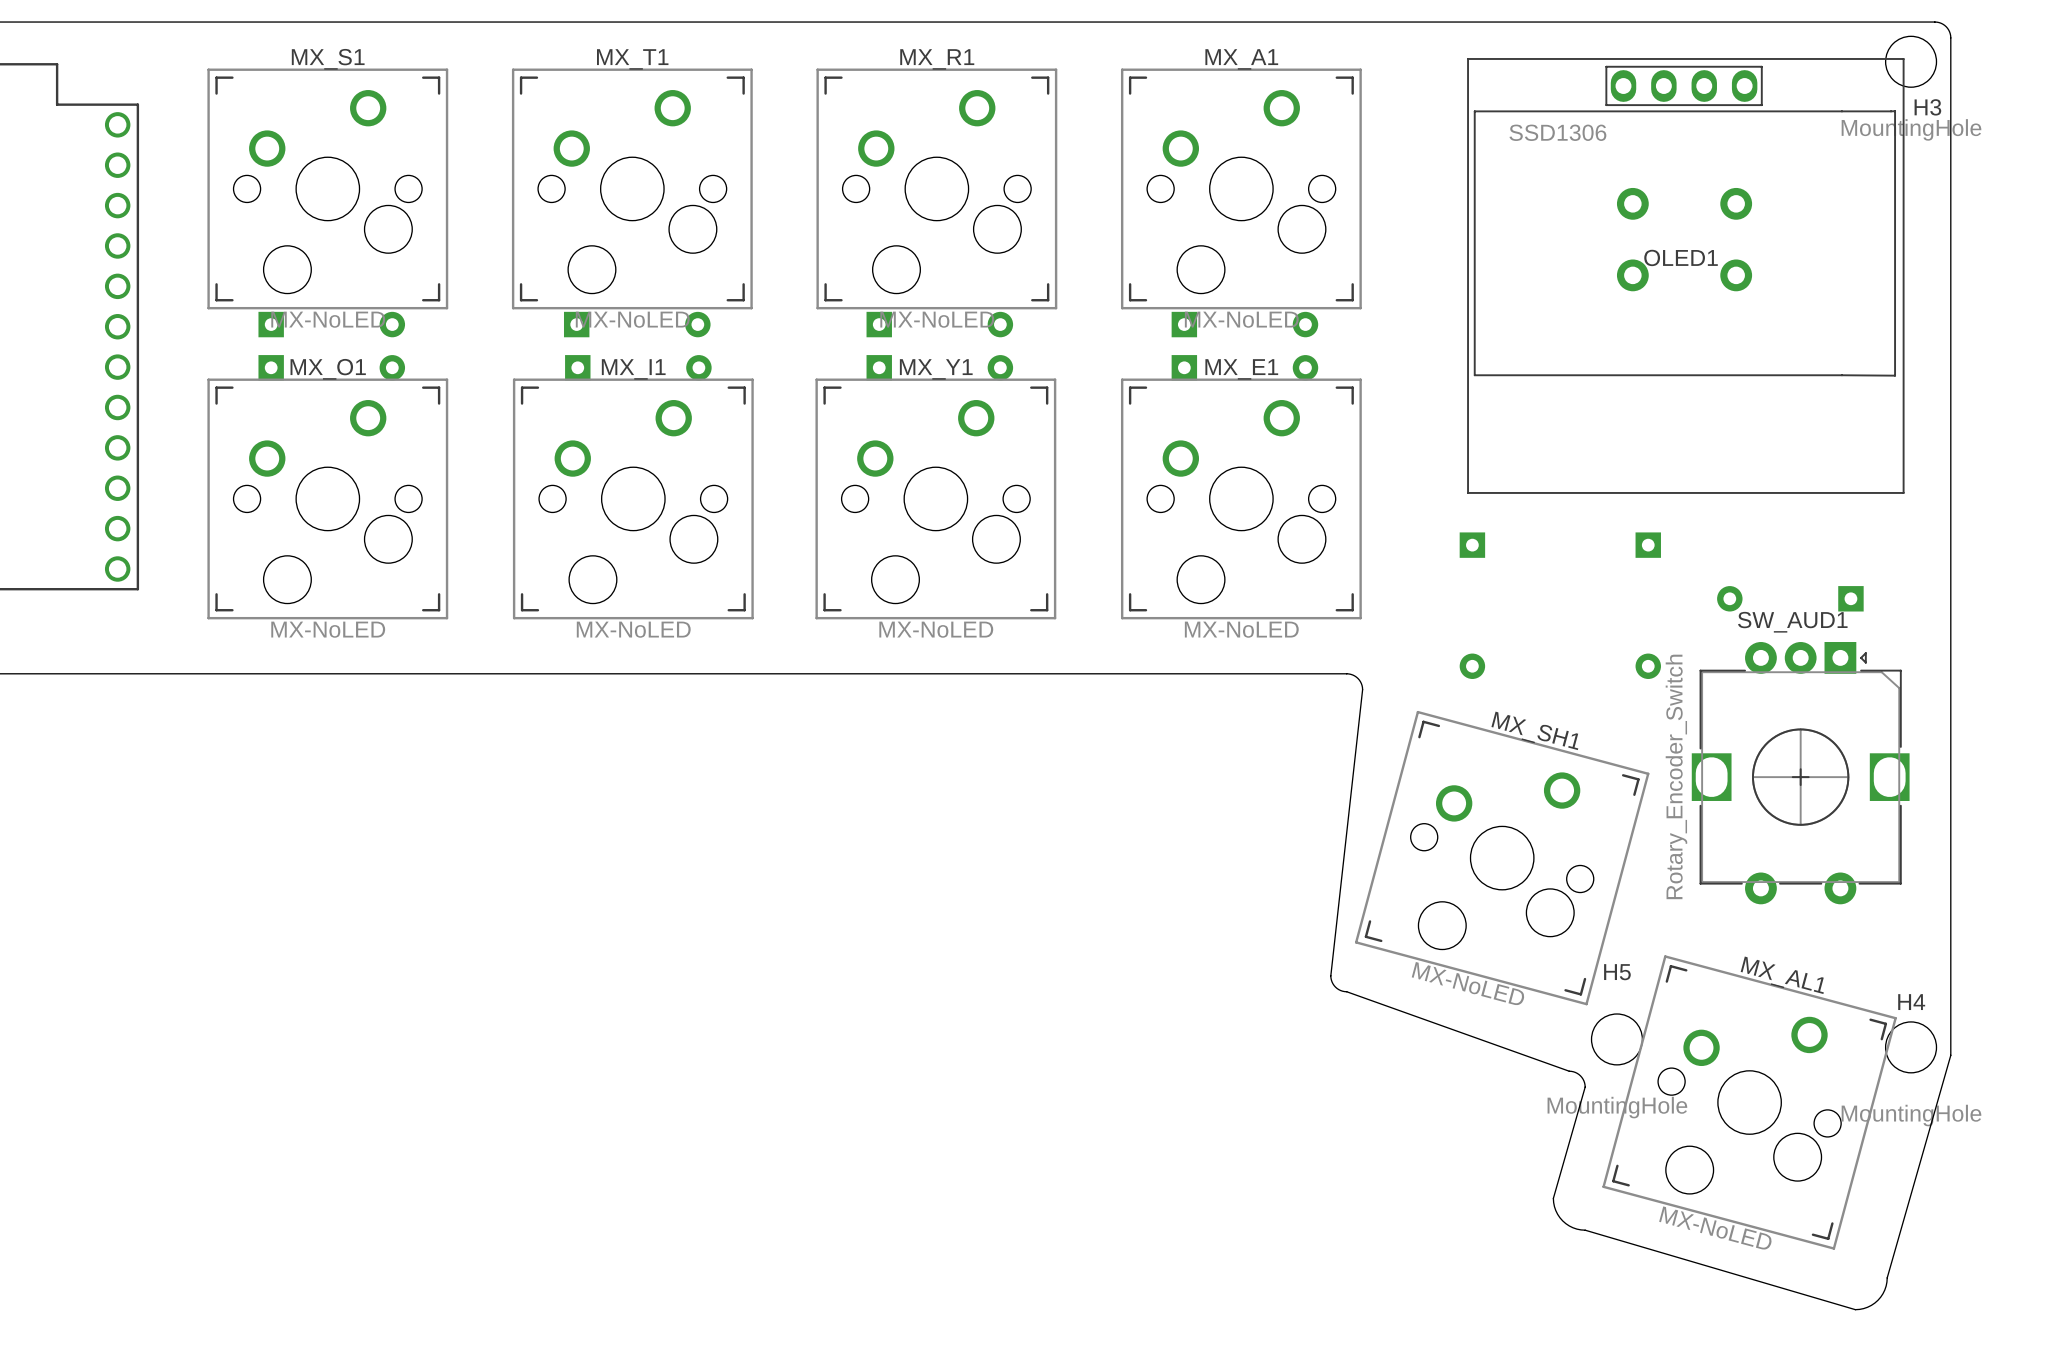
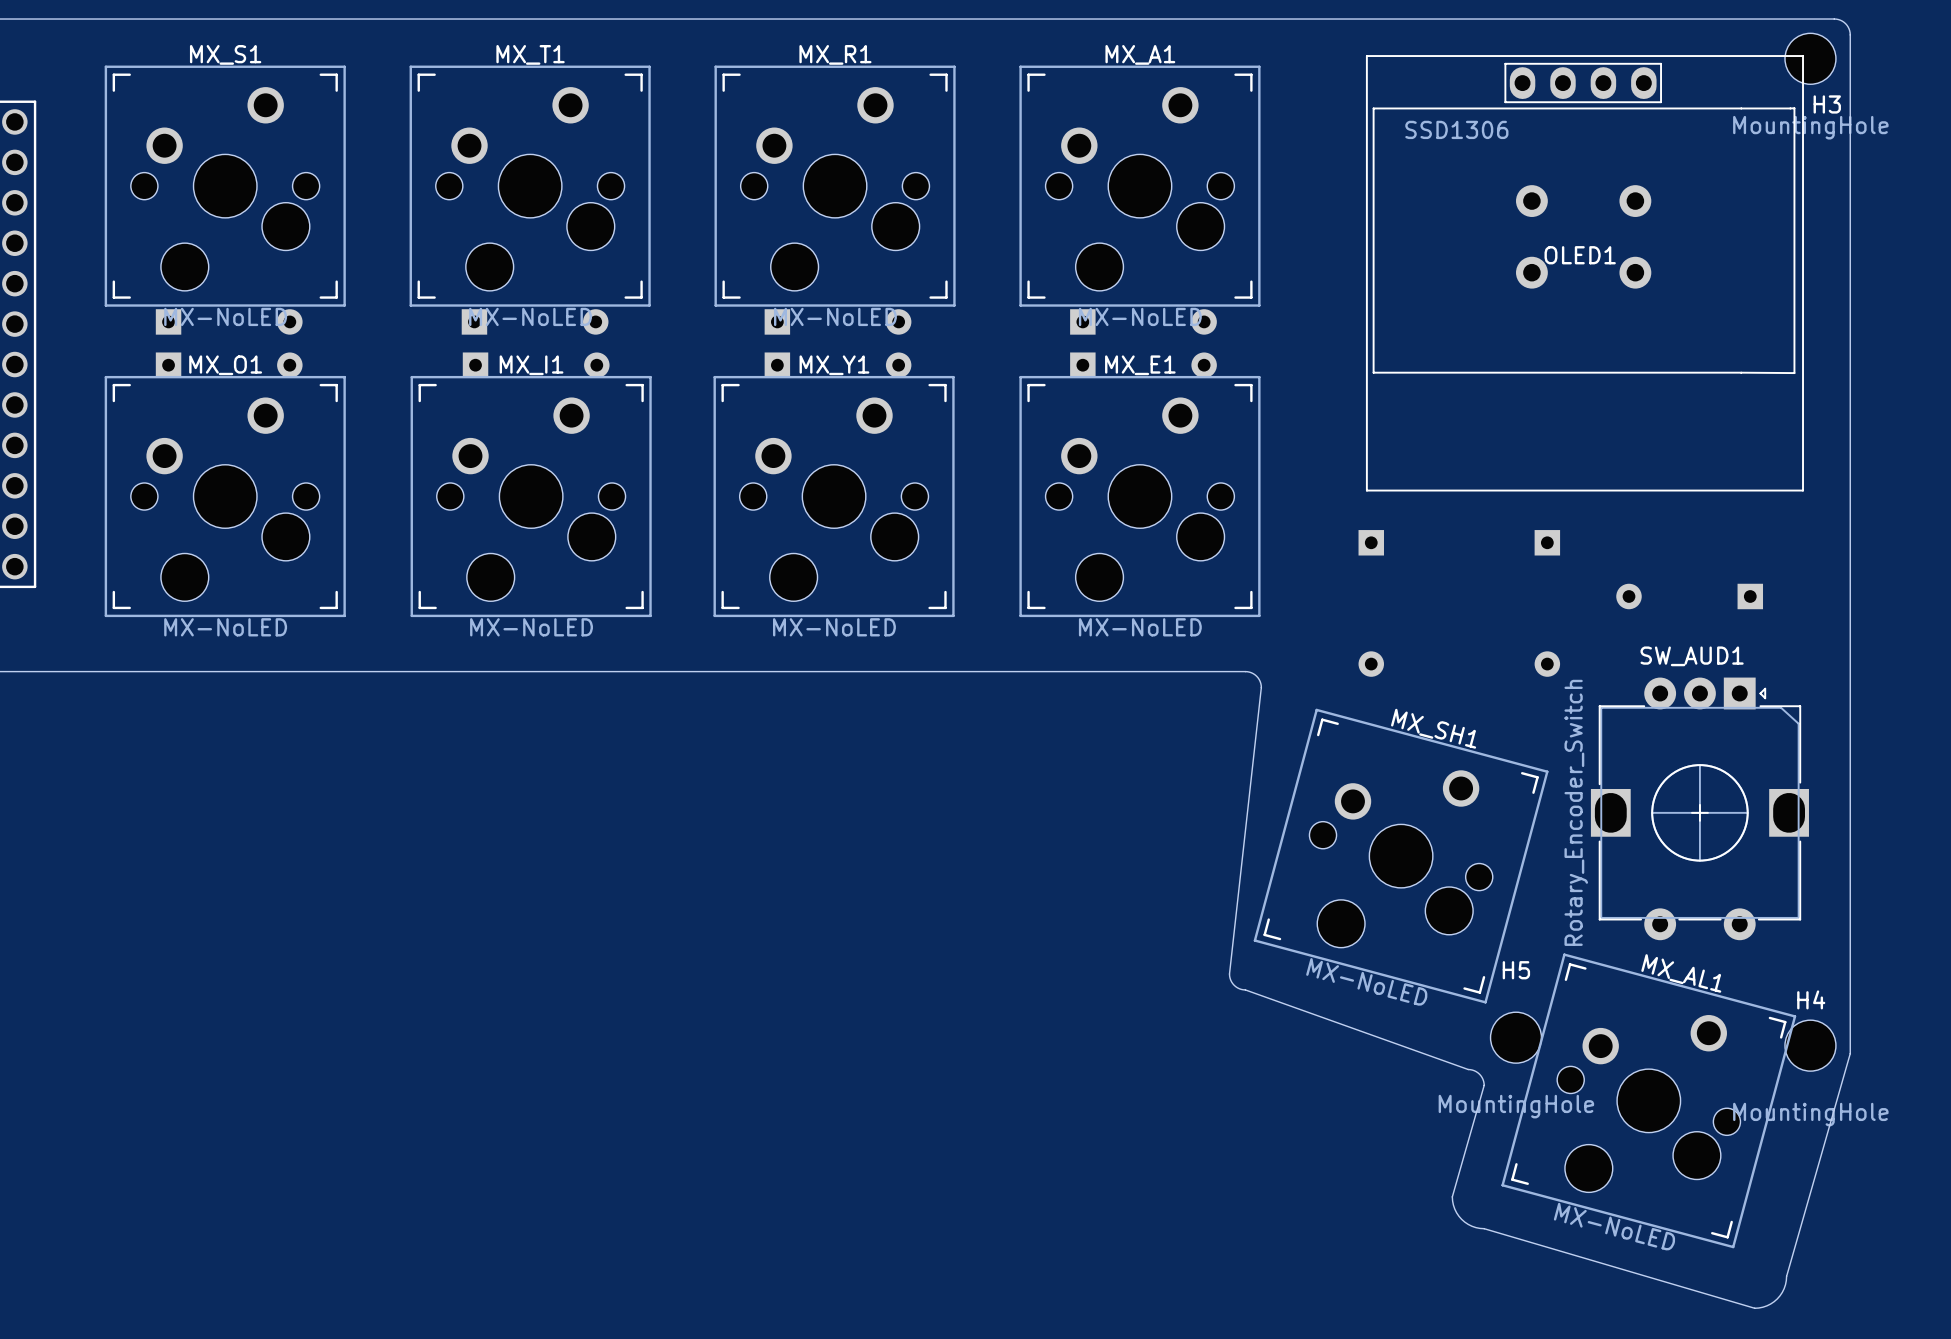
SW_AUD1 position: (1800, 773) -> (1699, 808)

